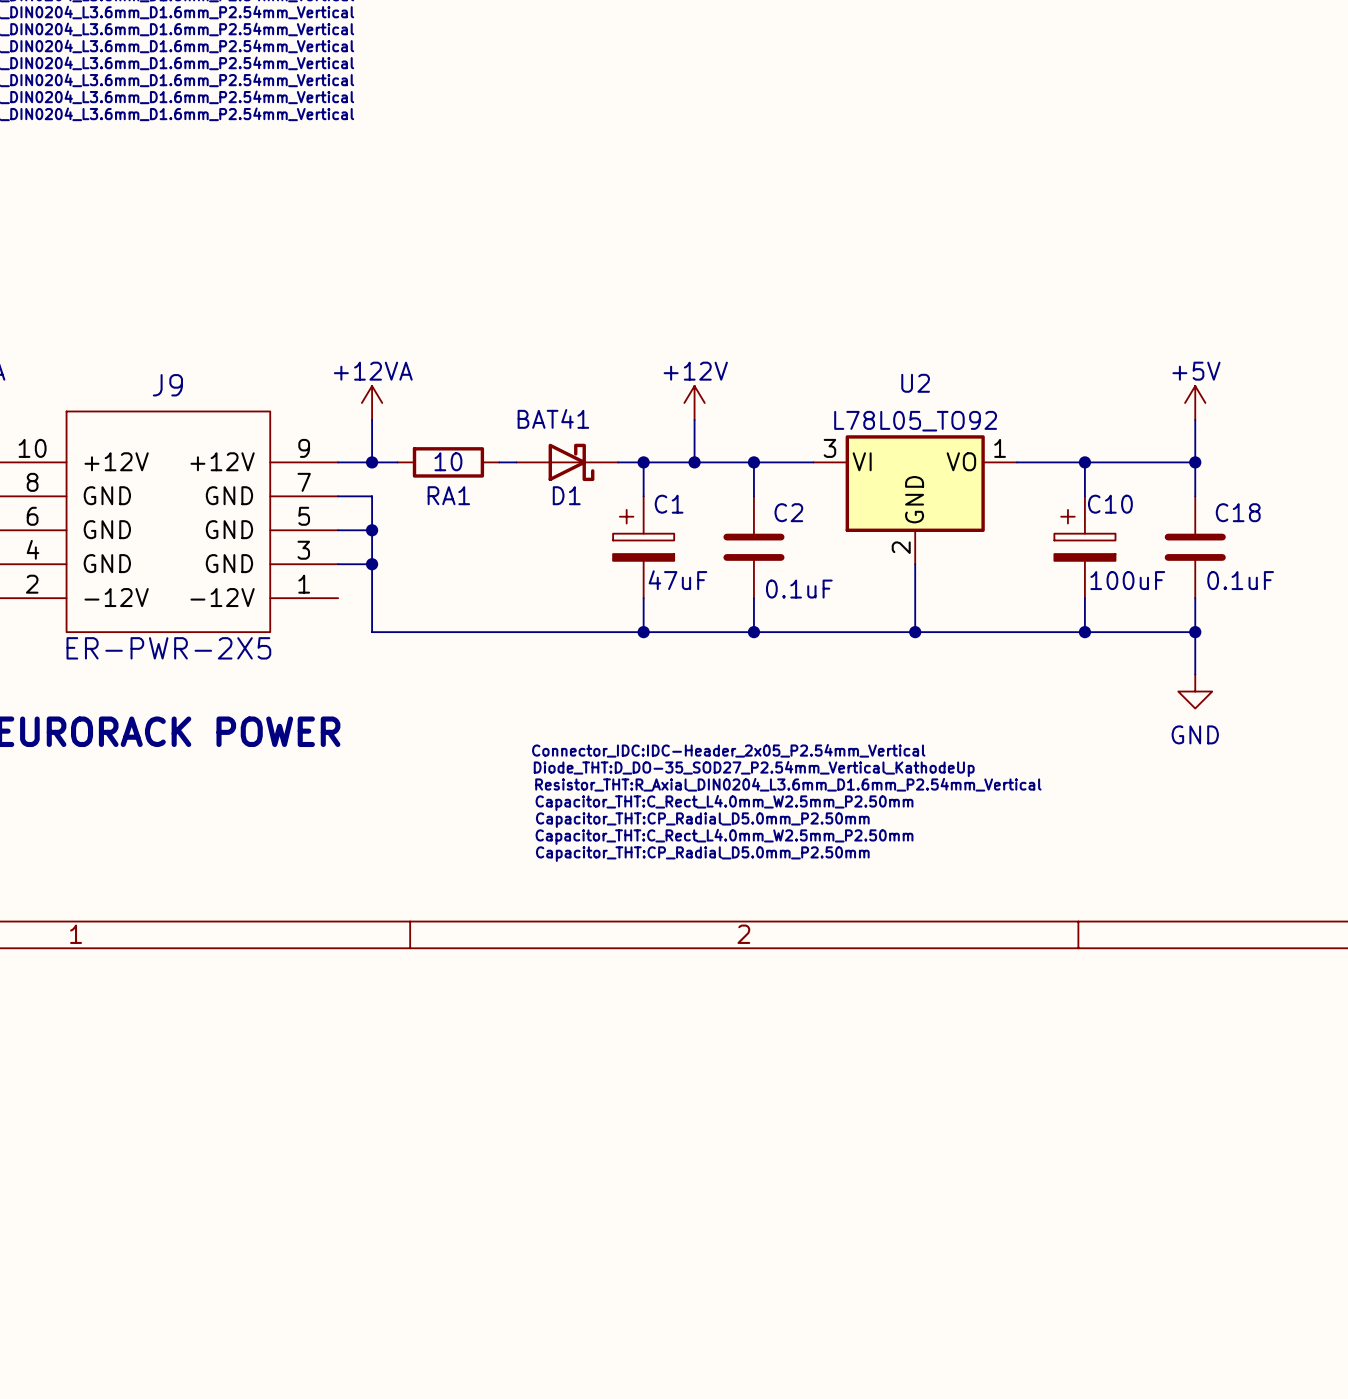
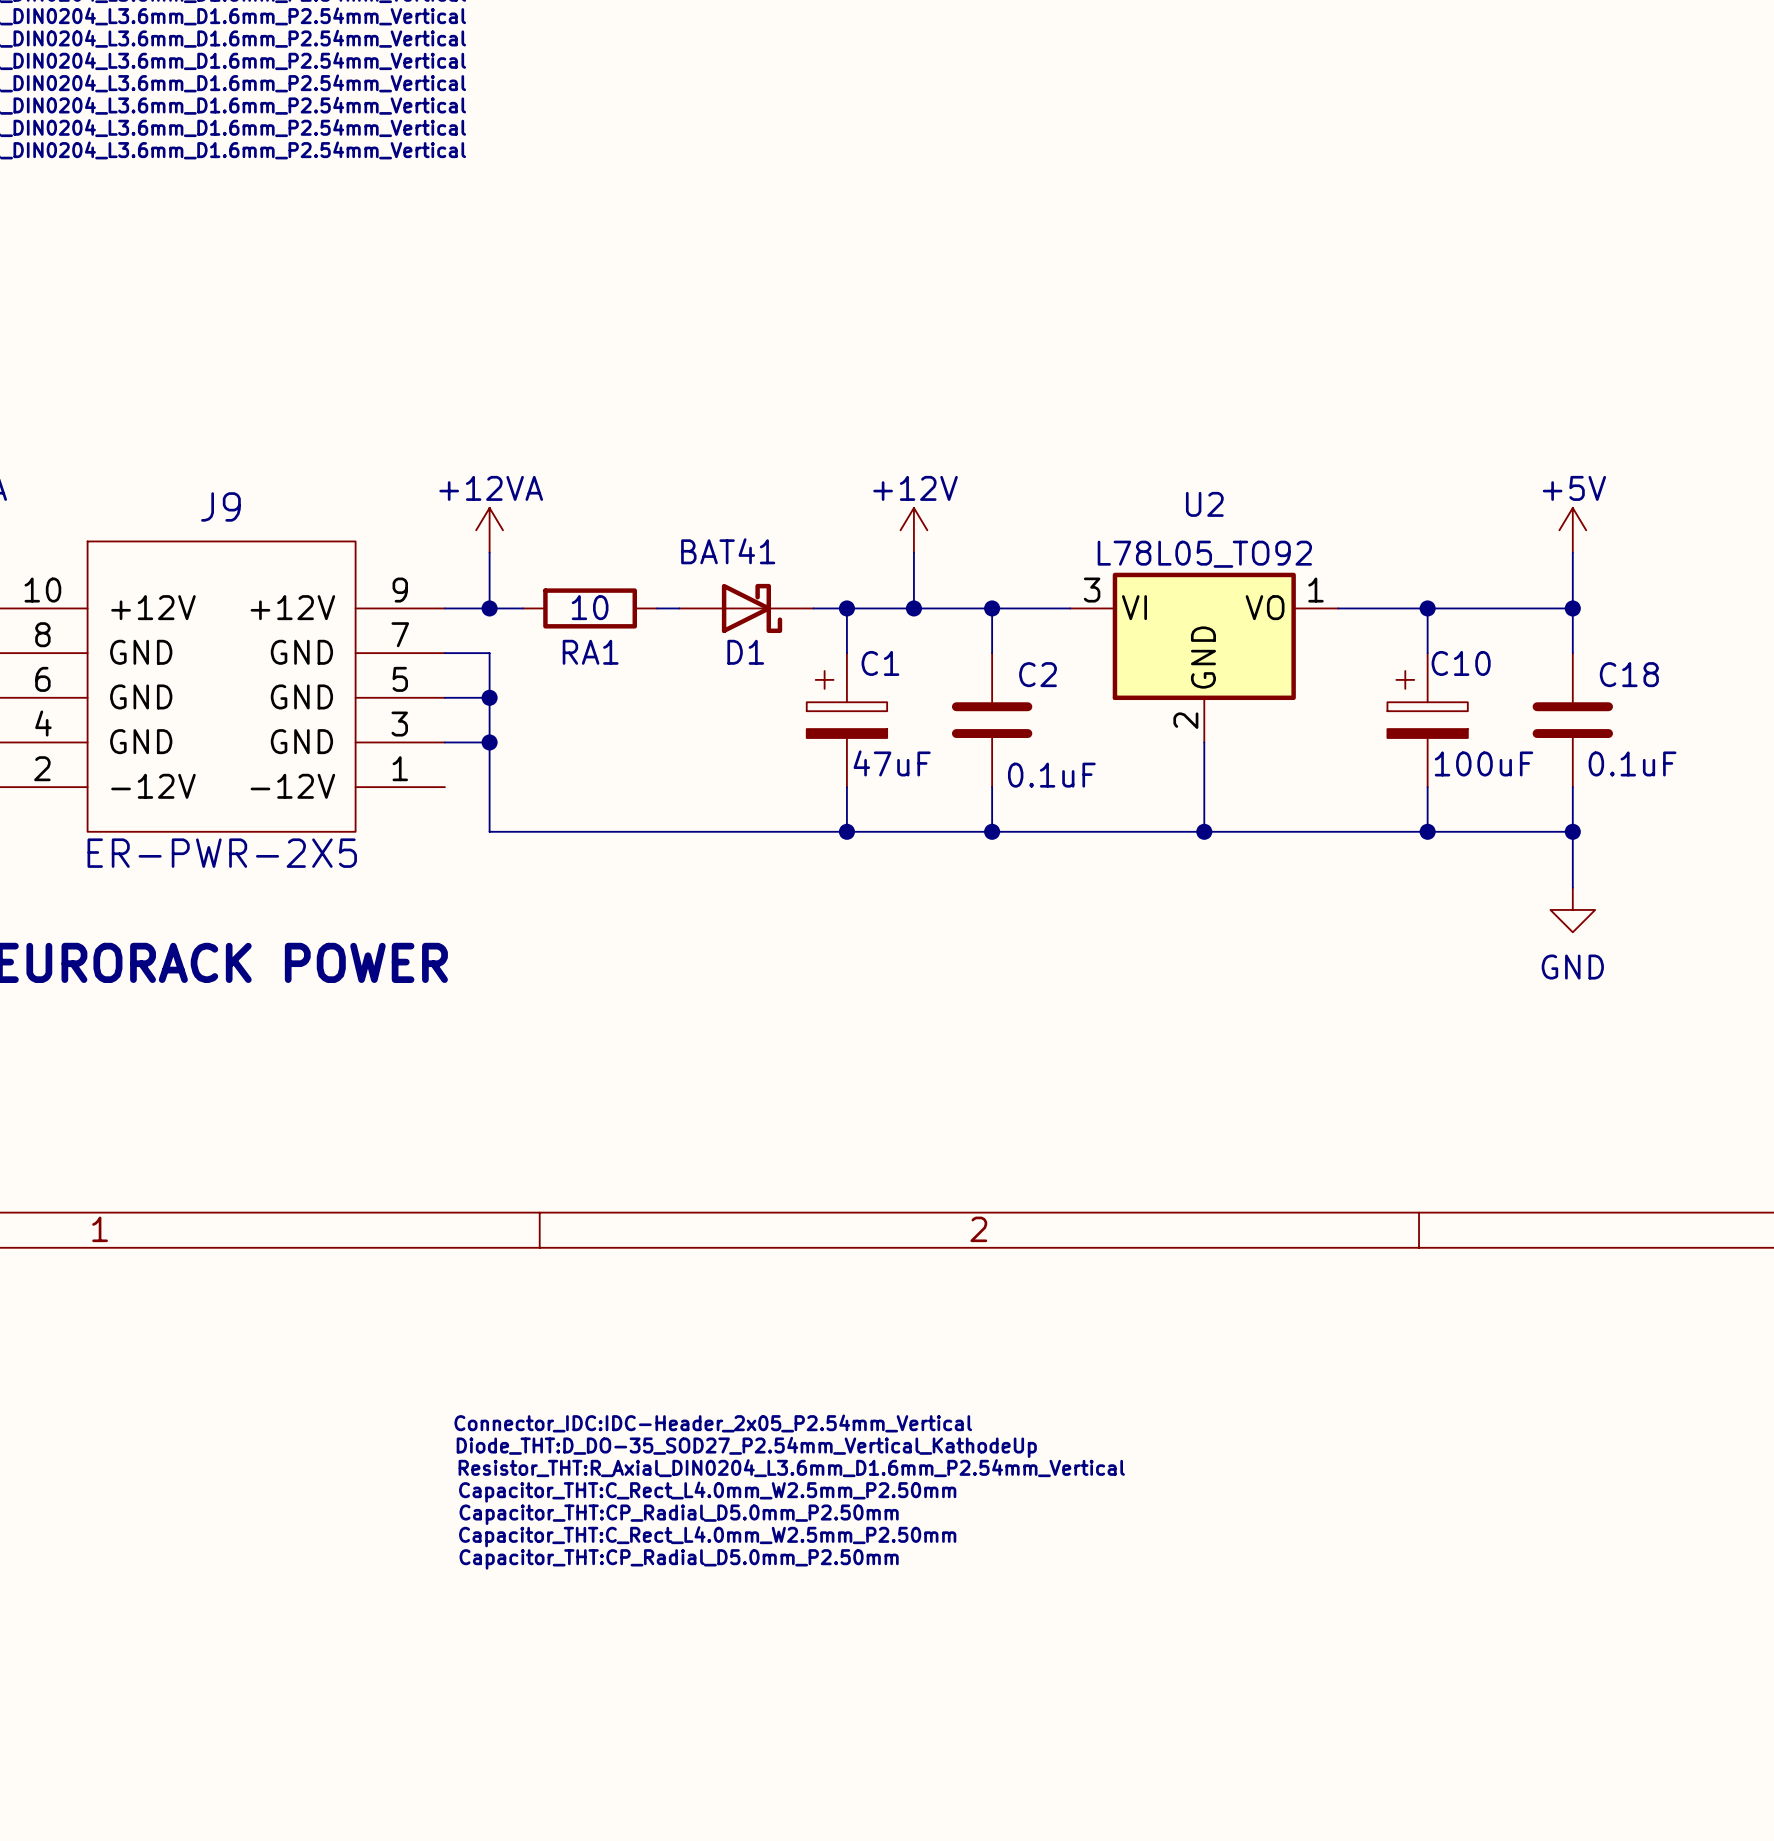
J9 text position: Connector_IDC:IDC-Header_2x05_P2.54mm_Vertical (728, 750) -> Connector_IDC:IDC-Header_2x05_P2.54mm_Vertical (713, 1423)
D1 text position: Diode_THT:D_DO-35_SOD27_P2.54mm_Vertical_KathodeUp (754, 768) -> Diode_THT:D_DO-35_SOD27_P2.54mm_Vertical_KathodeUp (746, 1447)
RA1 text position: Resistor_THT:R_Axial_DIN0204_L3.6mm_D1.6mm_P2.54mm_Vertical (788, 784) -> Resistor_THT:R_Axial_DIN0204_L3.6mm_D1.6mm_P2.54mm_Vertical (791, 1468)
C18 text position: Capacitor_THT:C_Rect_L4.0mm_W2.5mm_P2.50mm (724, 802) -> Capacitor_THT:C_Rect_L4.0mm_W2.5mm_P2.50mm (707, 1492)
C10 text position: Capacitor_THT:CP_Radial_D5.0mm_P2.50mm (702, 820) -> Capacitor_THT:CP_Radial_D5.0mm_P2.50mm (679, 1514)
C2 text position: Capacitor_THT:C_Rect_L4.0mm_W2.5mm_P2.50mm (724, 836) -> Capacitor_THT:C_Rect_L4.0mm_W2.5mm_P2.50mm (707, 1536)
C1 text position: Capacitor_THT:CP_Radial_D5.0mm_P2.50mm (702, 854) -> Capacitor_THT:CP_Radial_D5.0mm_P2.50mm (679, 1559)

